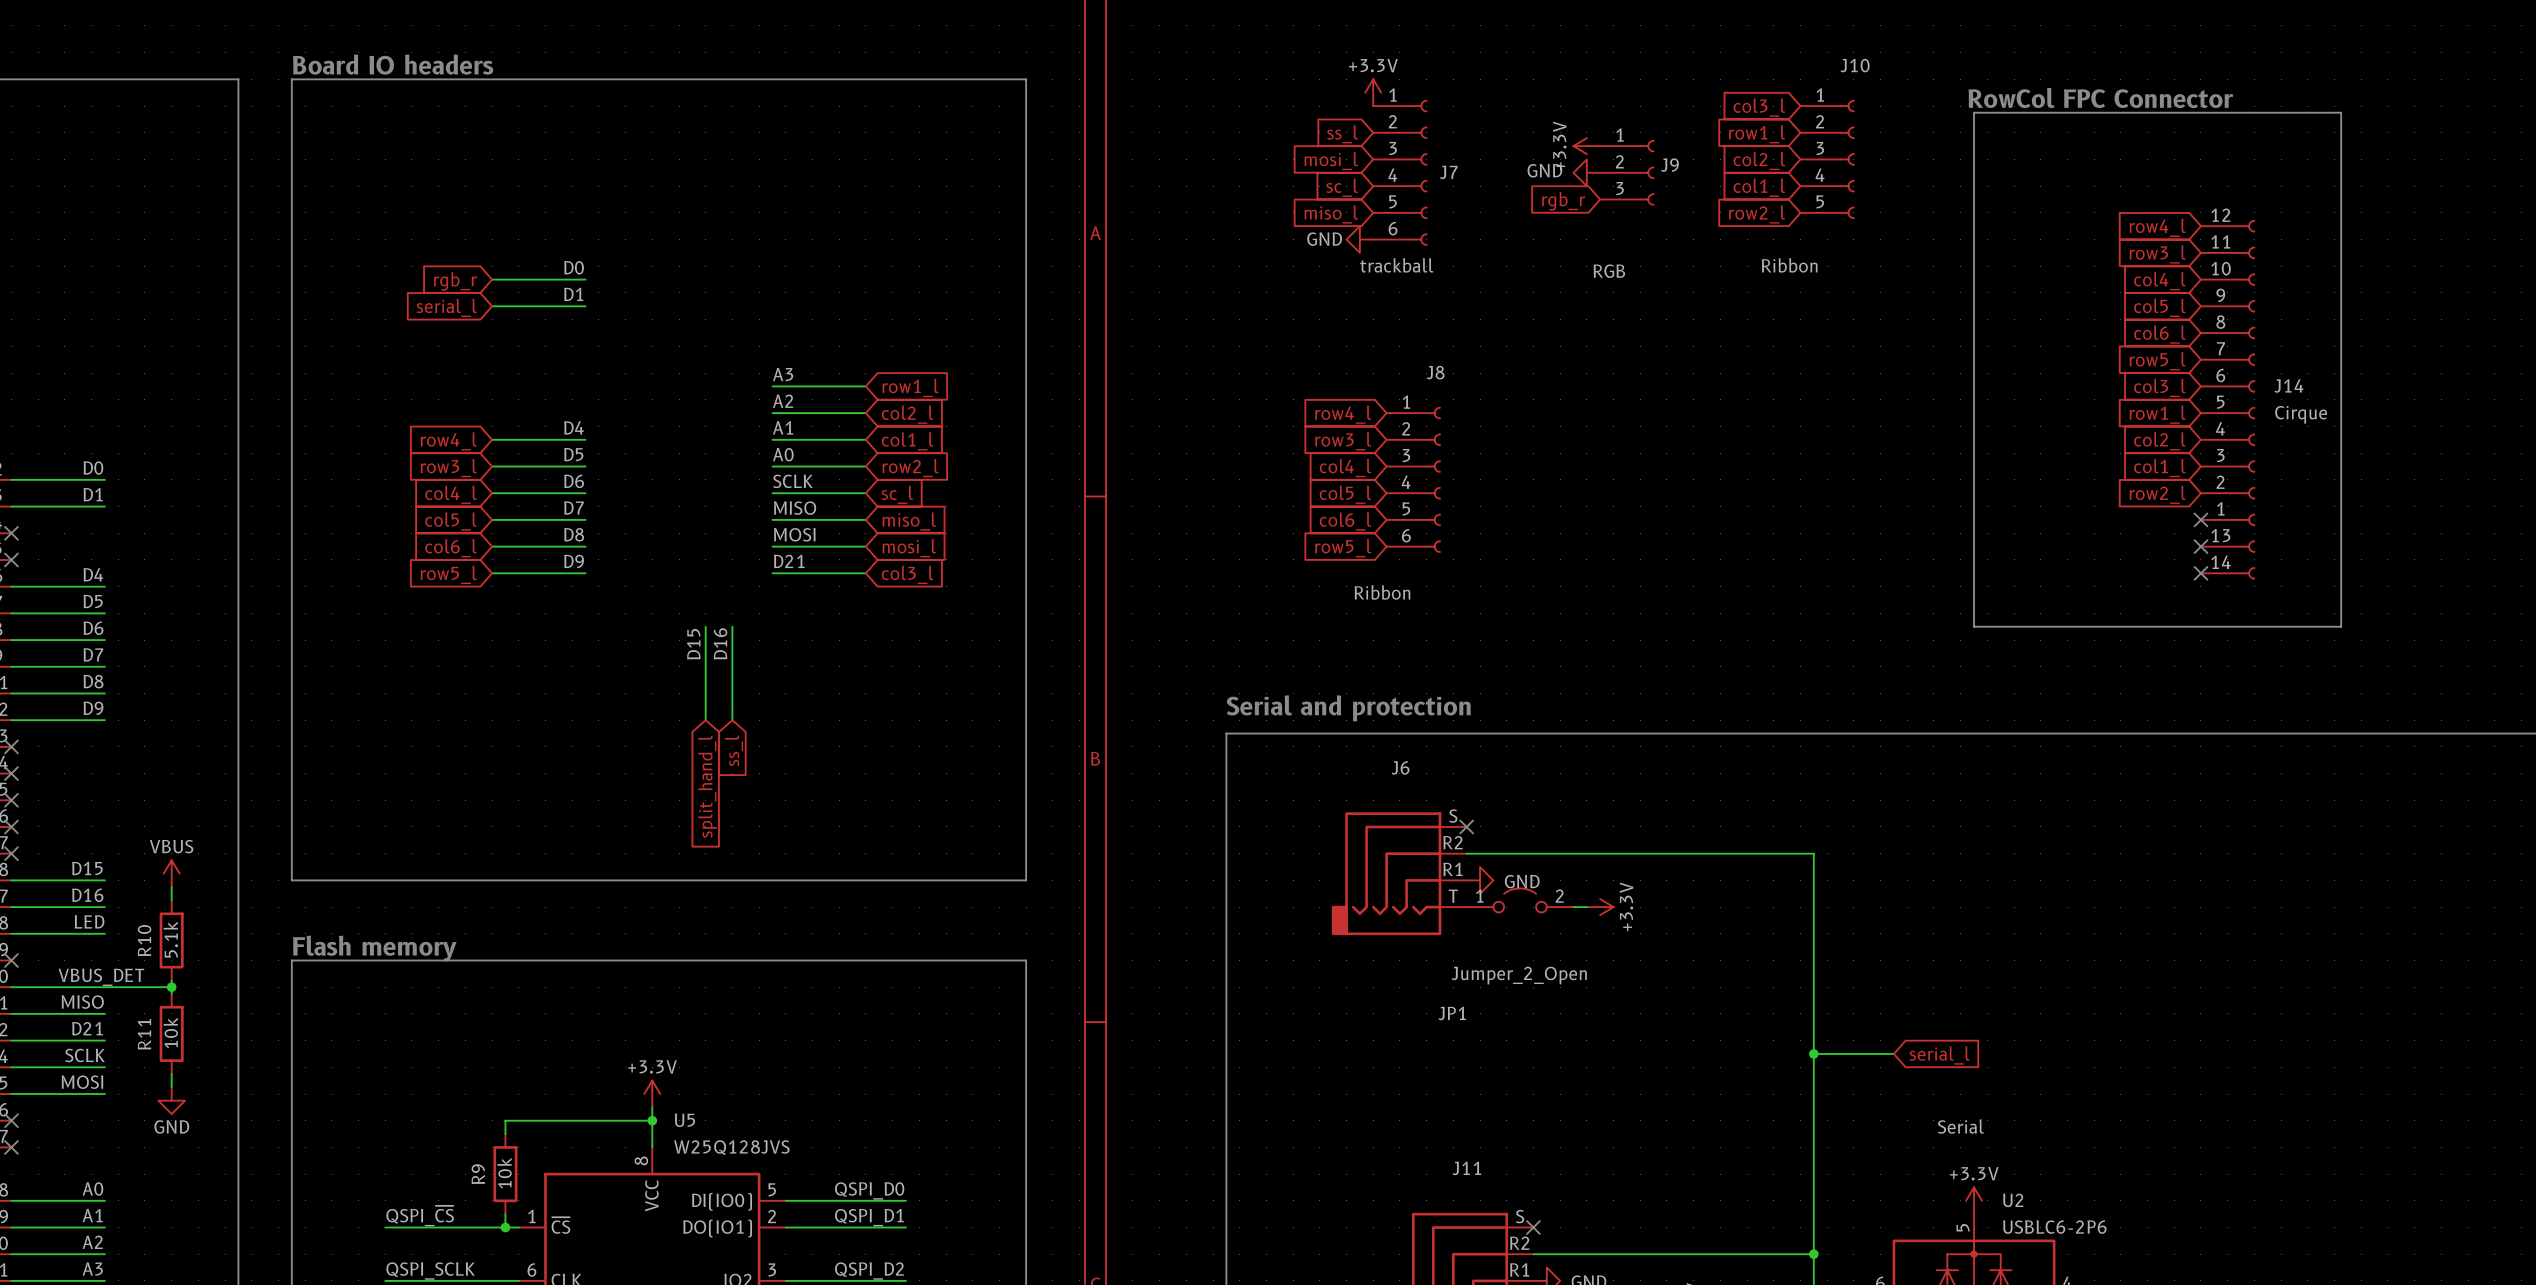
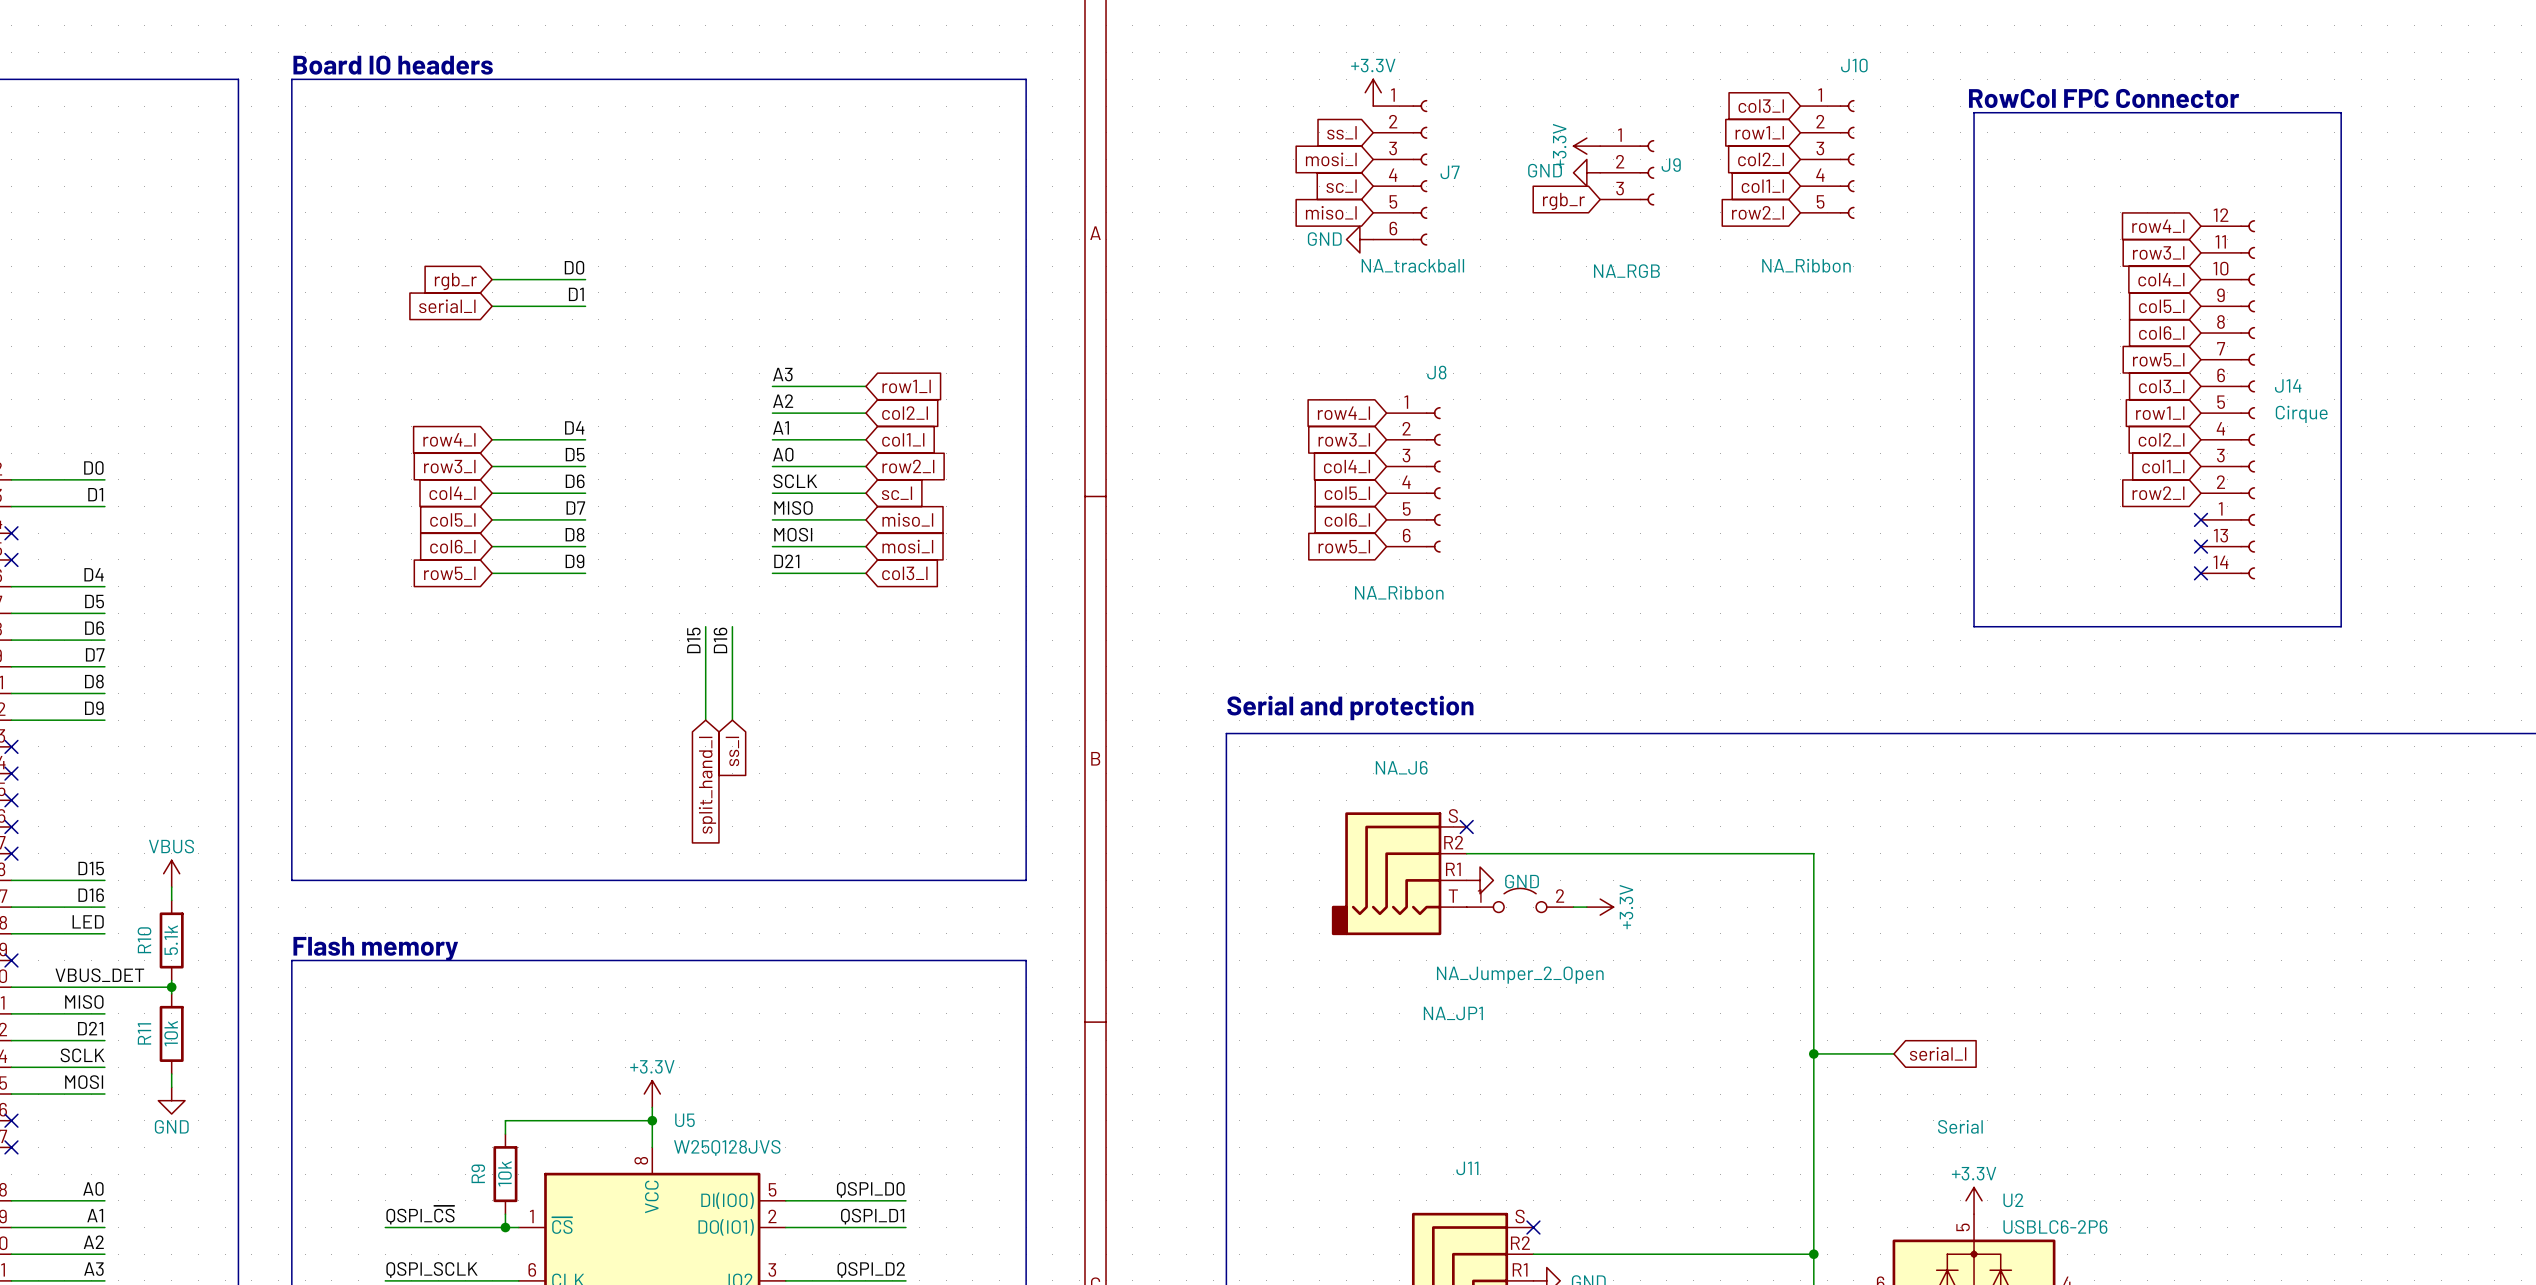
J7 value: trackball (1396, 265) -> NA_trackball (1412, 265)
J10 value: Ribbon (1789, 265) -> NA_Ribbon (1806, 265)
J9 value: RGB (1609, 271) -> NA_RGB (1626, 271)
J8 value: Ribbon (1382, 592) -> NA_Ribbon (1399, 592)
J6 name: J6 (1400, 767) -> NA_J6 (1401, 767)
JP1 value: Jumper_2_Open (1519, 975) -> NA_Jumper_2_Open (1520, 975)
JP1 name: JP1 (1452, 1013) -> NA_JP1 (1453, 1013)

